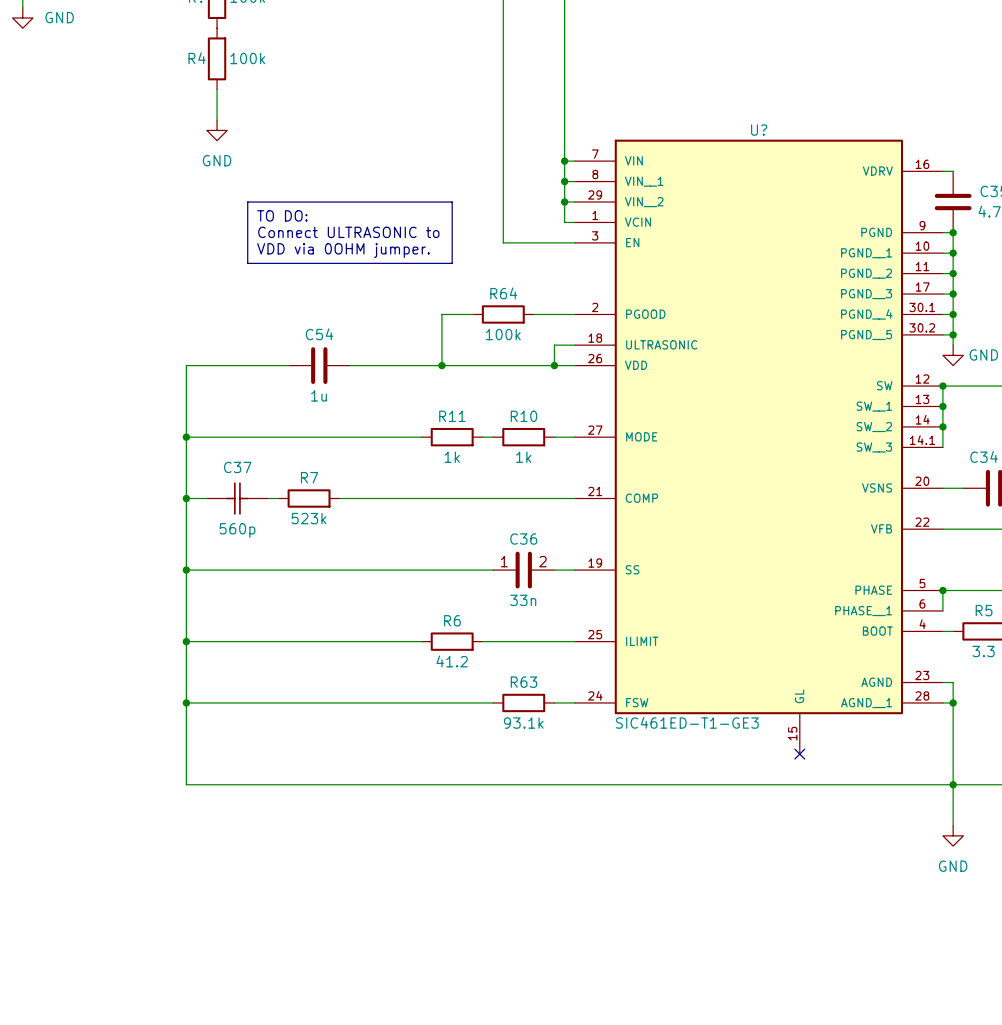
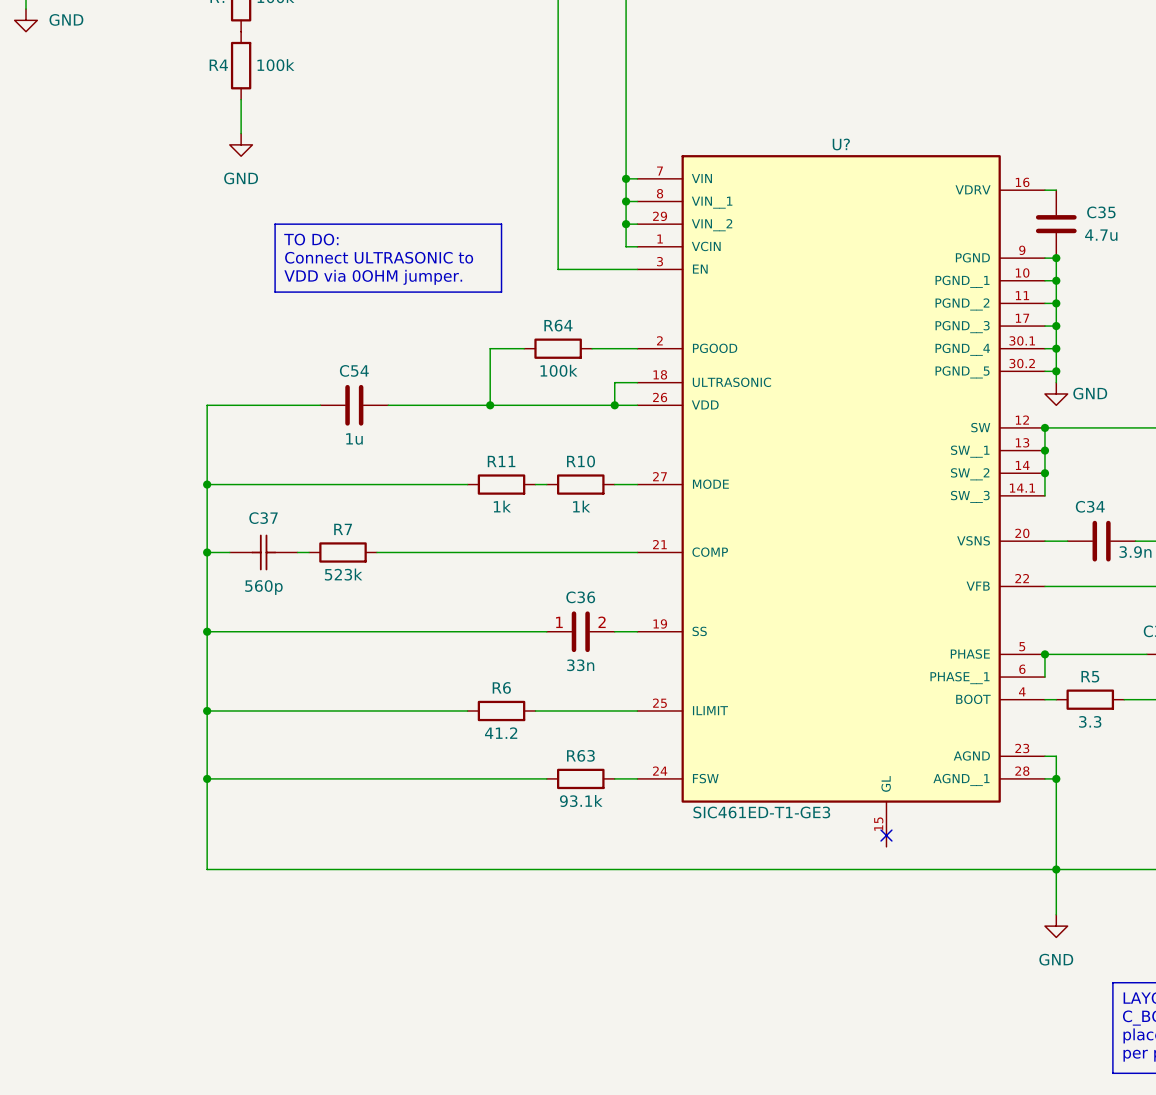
U? symbol: [574, 139, 943, 755] -> [637, 155, 1045, 847]

